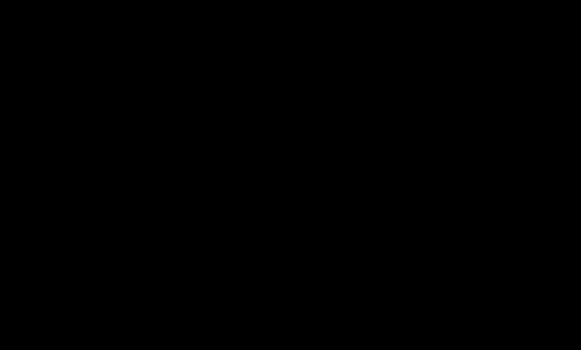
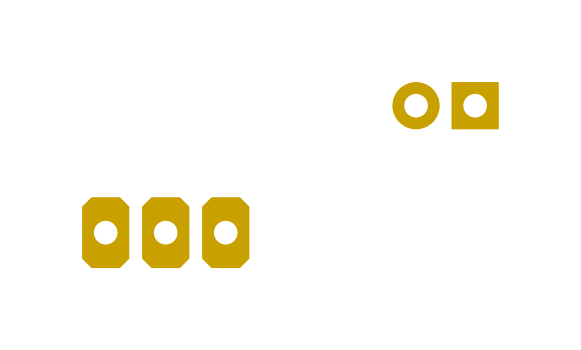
part: none -> (445, 105)
part: none -> (165, 232)

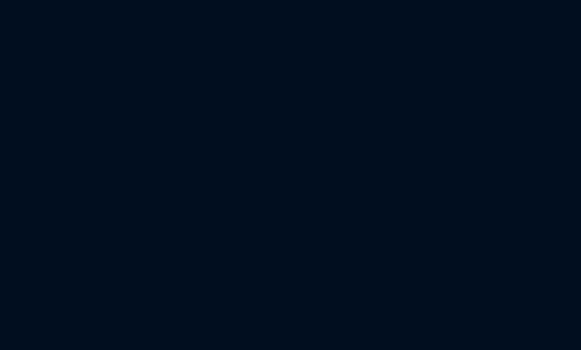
part: (445, 105) -> none
part: (165, 232) -> none

